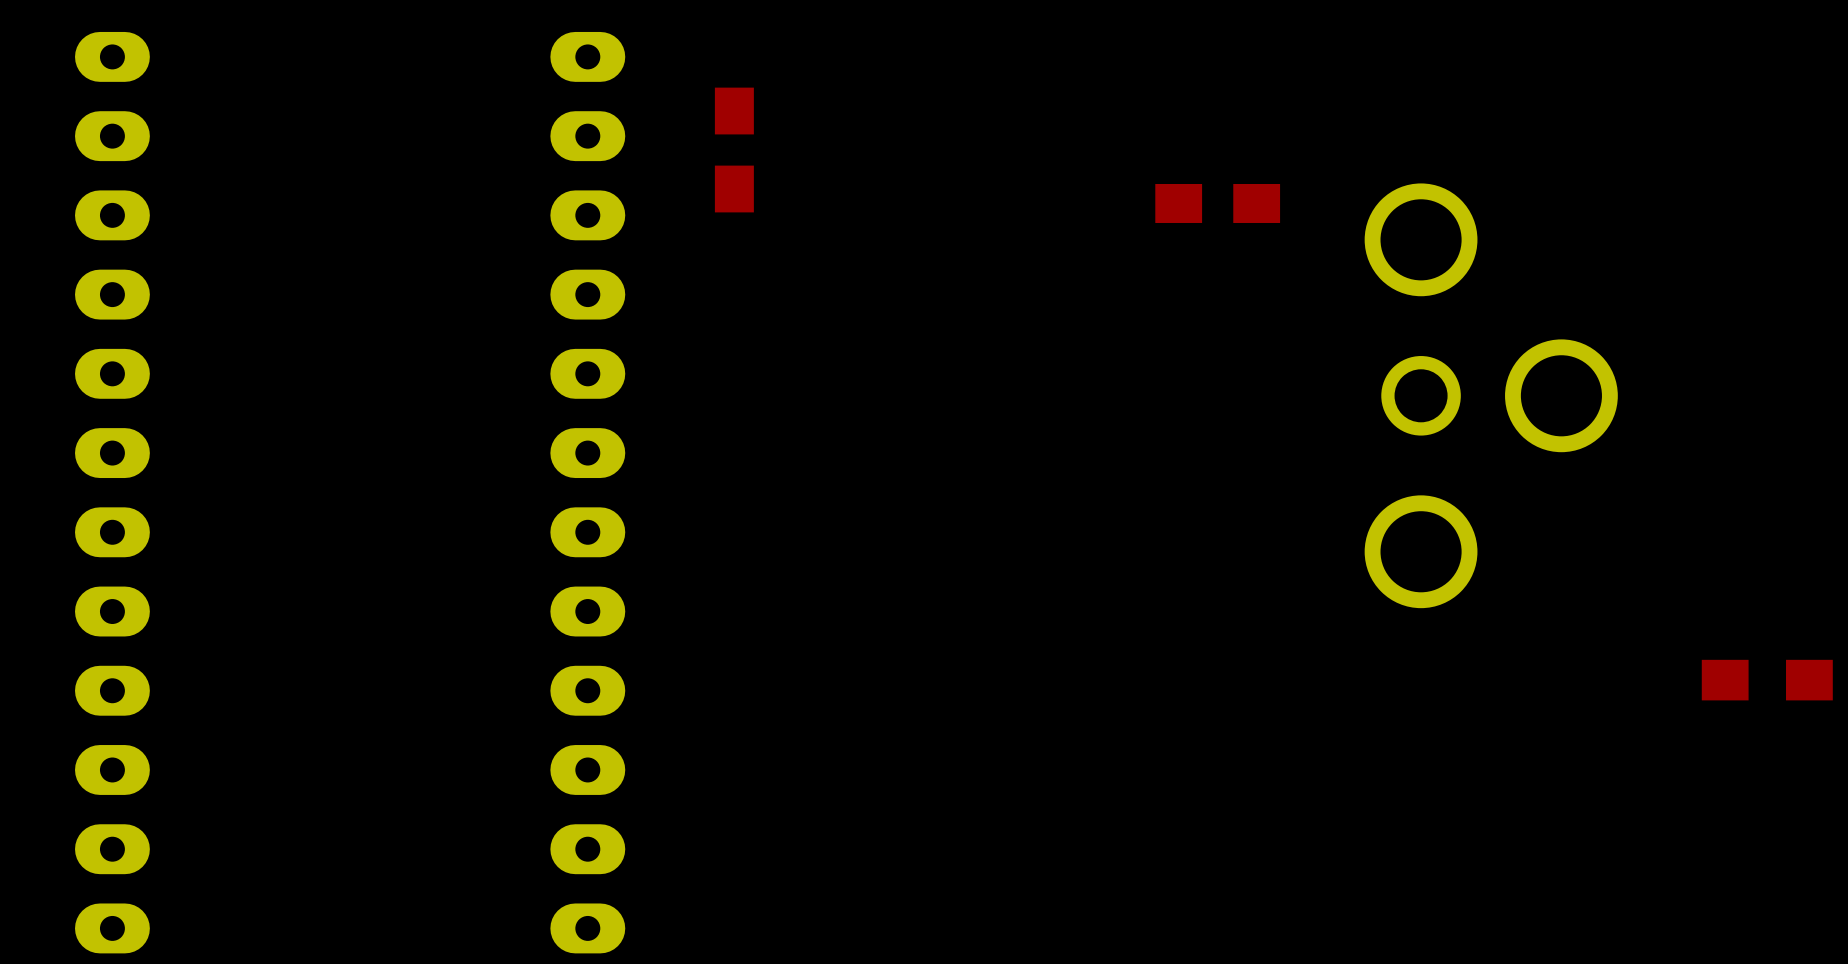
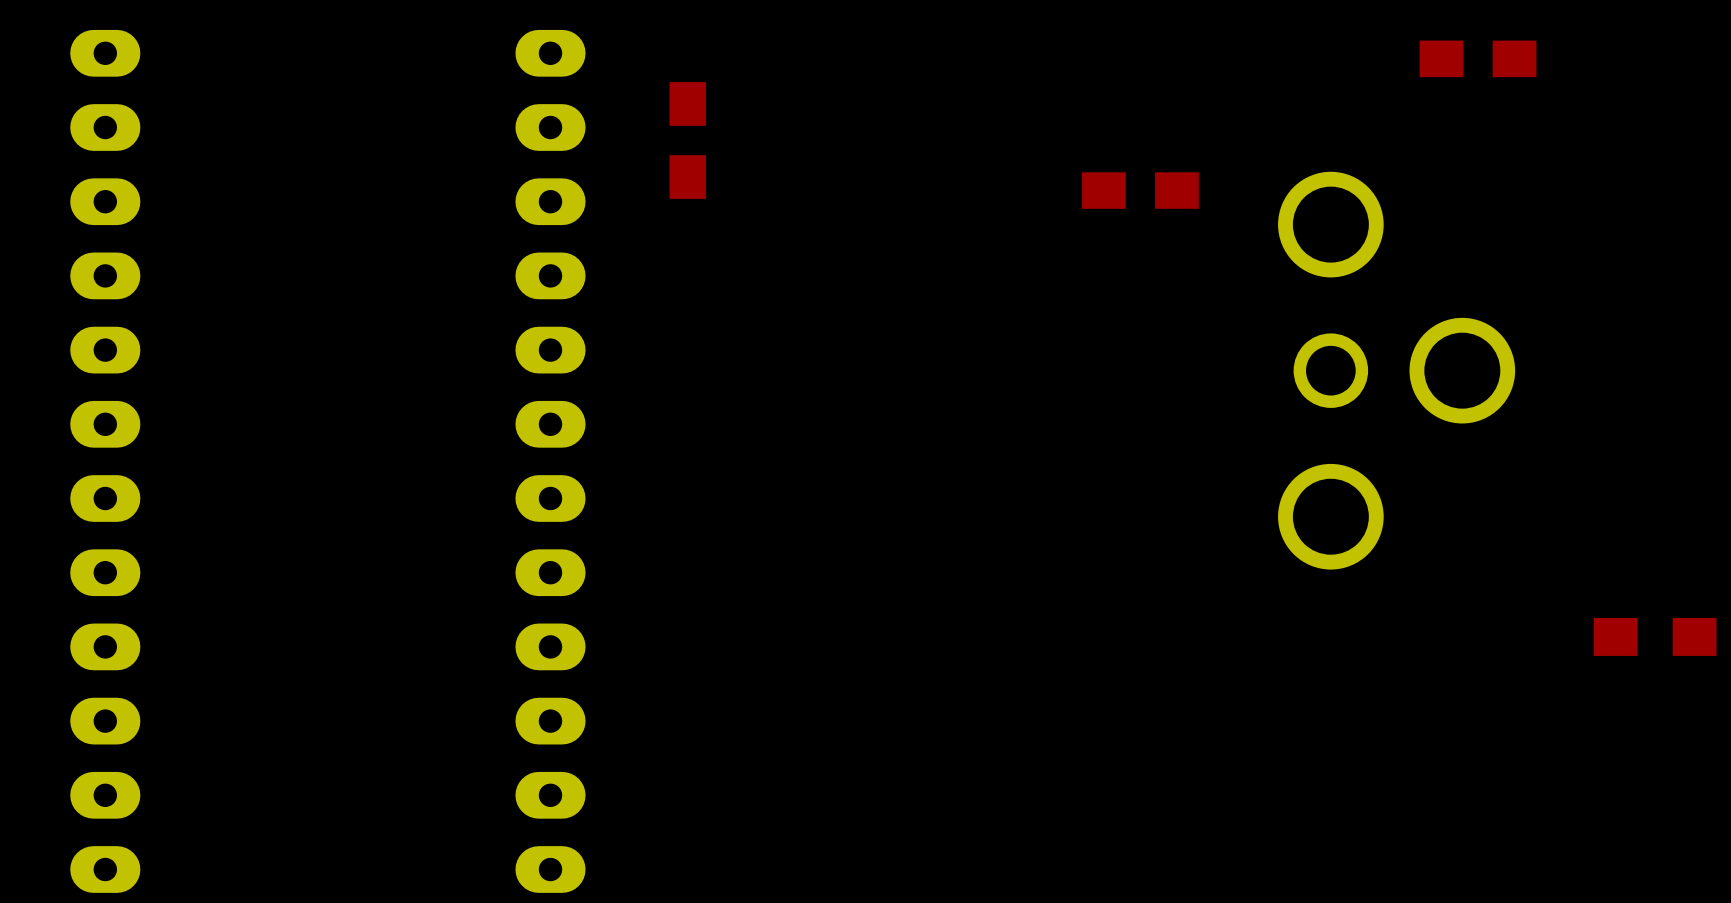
part: none -> (1478, 58)

